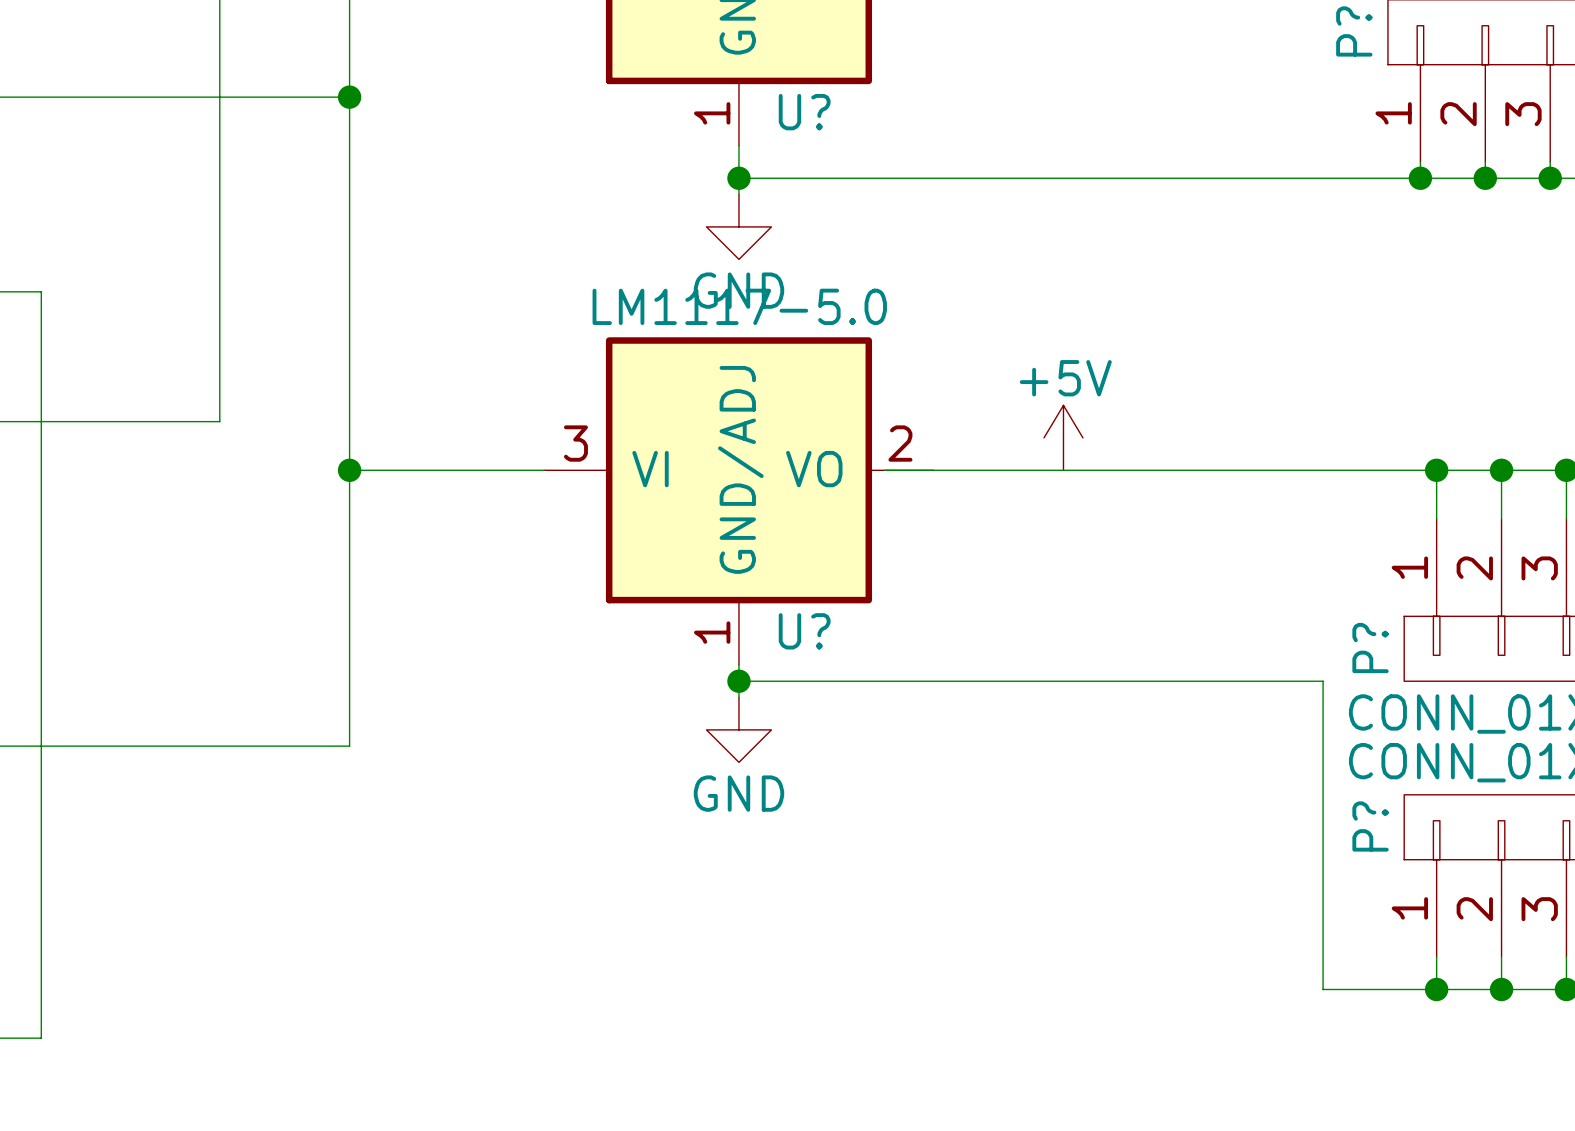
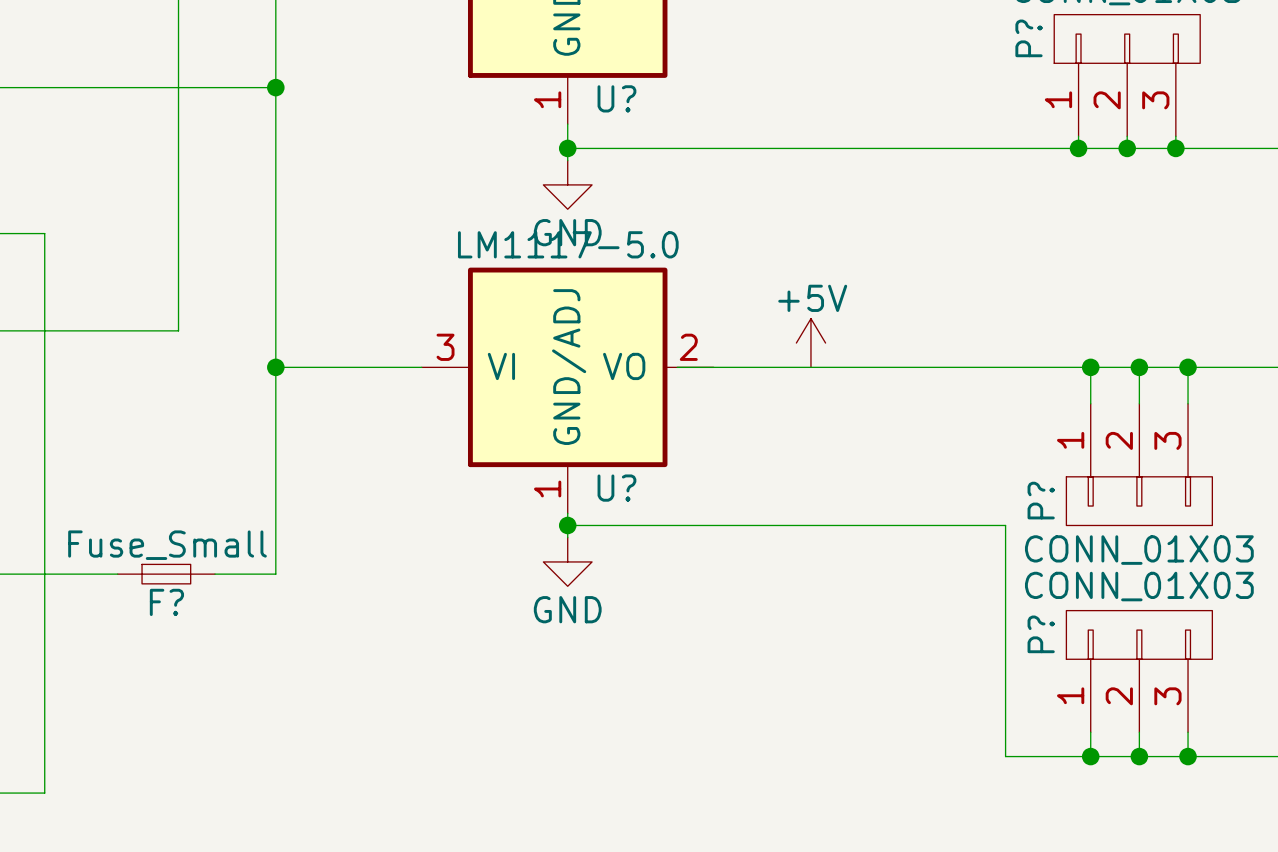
F?: none -> Fuse_Small (166, 574)

